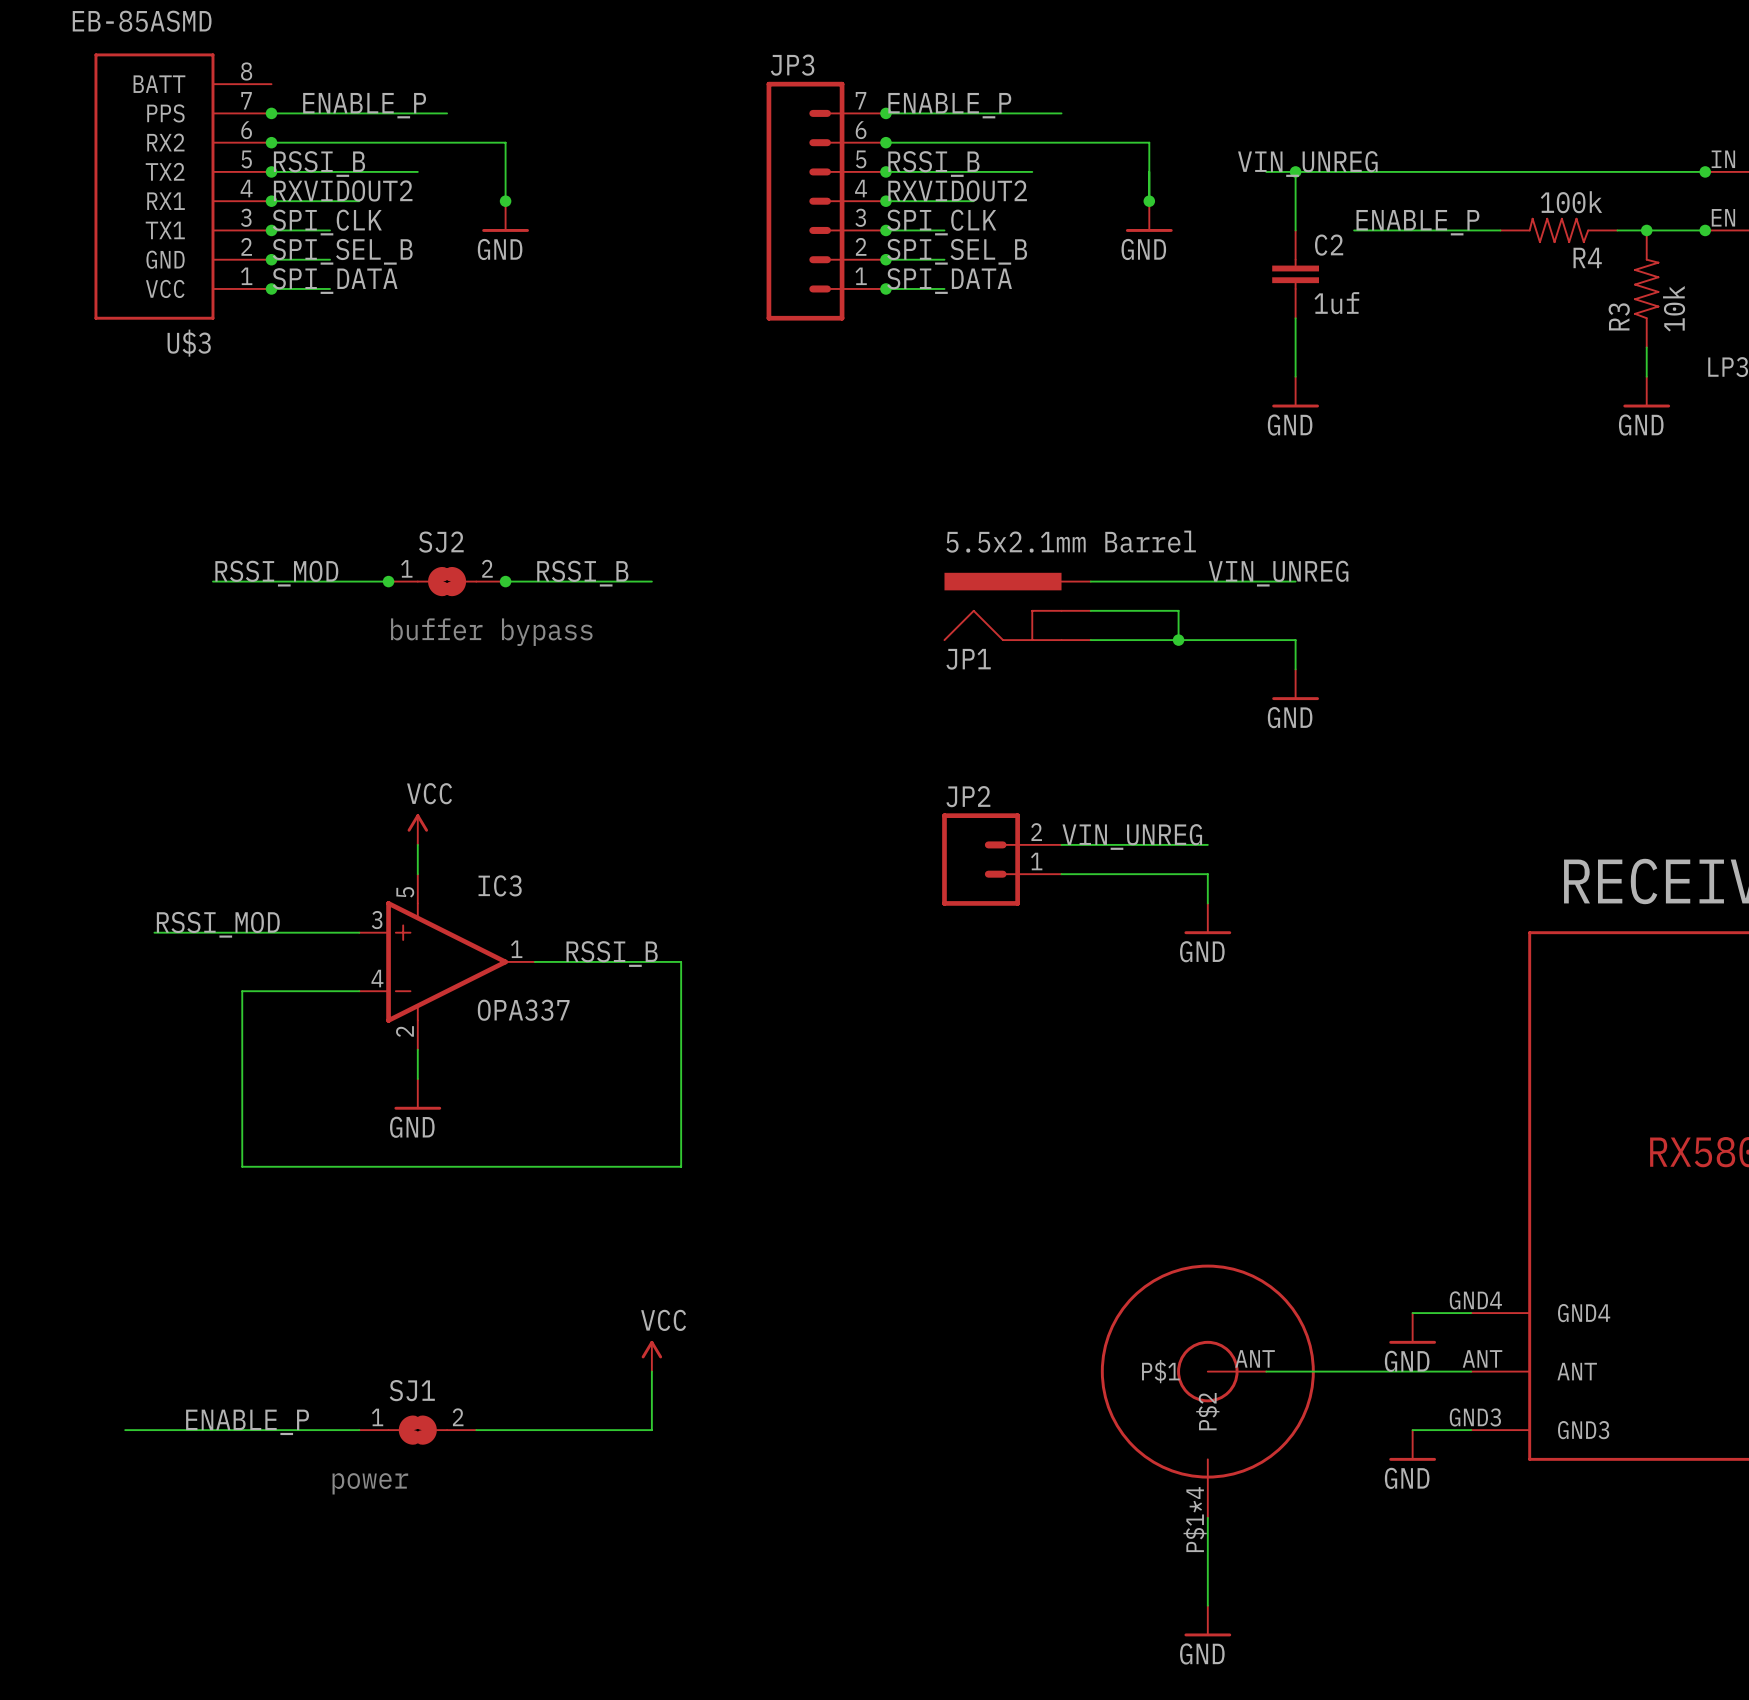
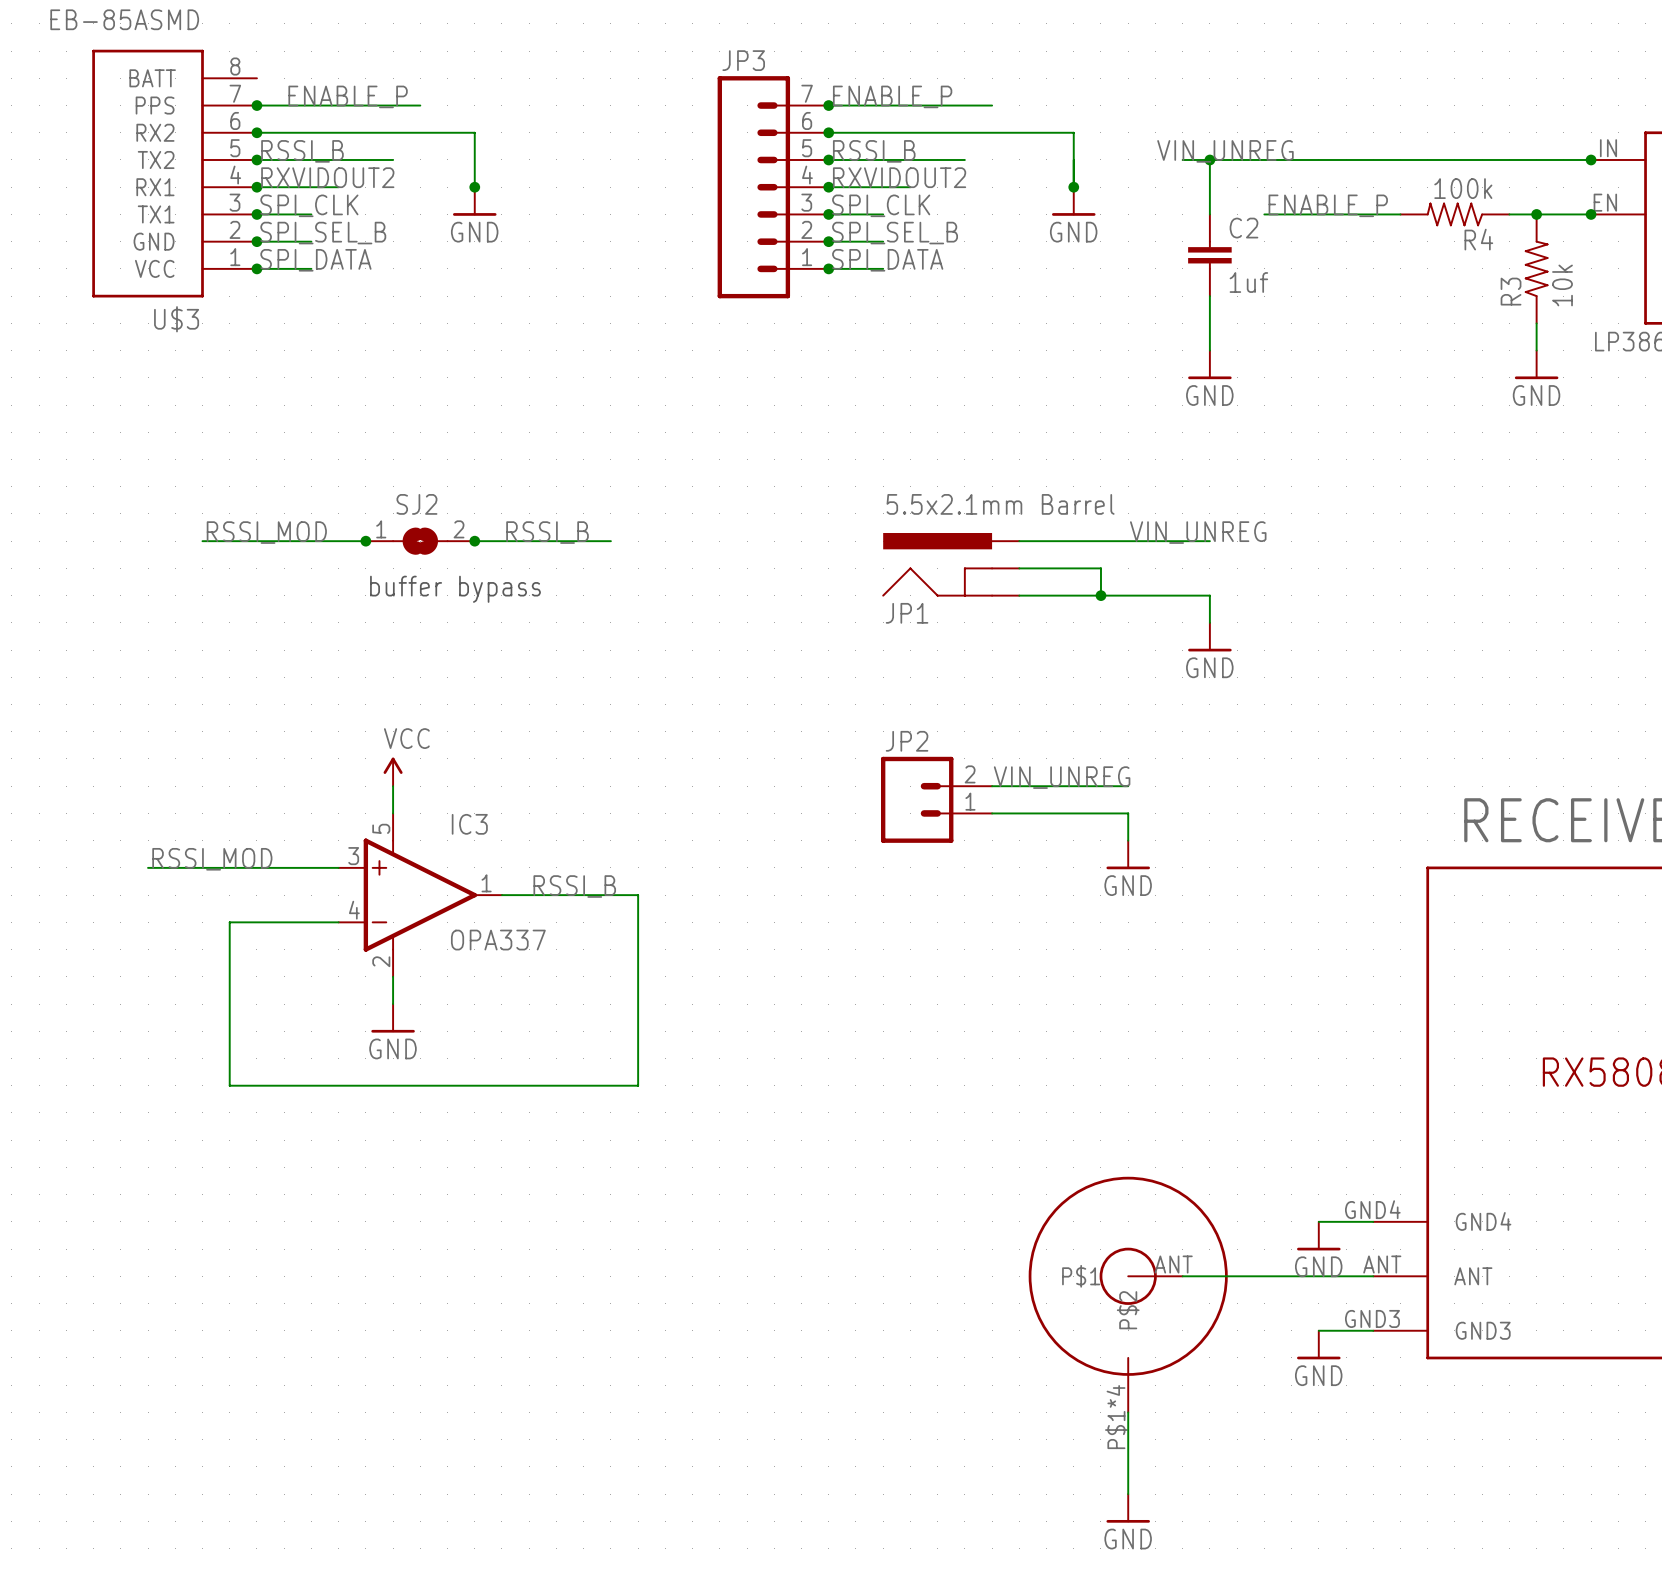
power symbol: VCC (651, 1356) -> none
wire: (651, 1371) (651, 1430) (476, 1430) -> none
label: ENABLE_P (247, 1422) -> none
wire: (125, 1430) (359, 1430) -> none
SJ1: (417, 1430) -> none
text: power (370, 1483) -> none

